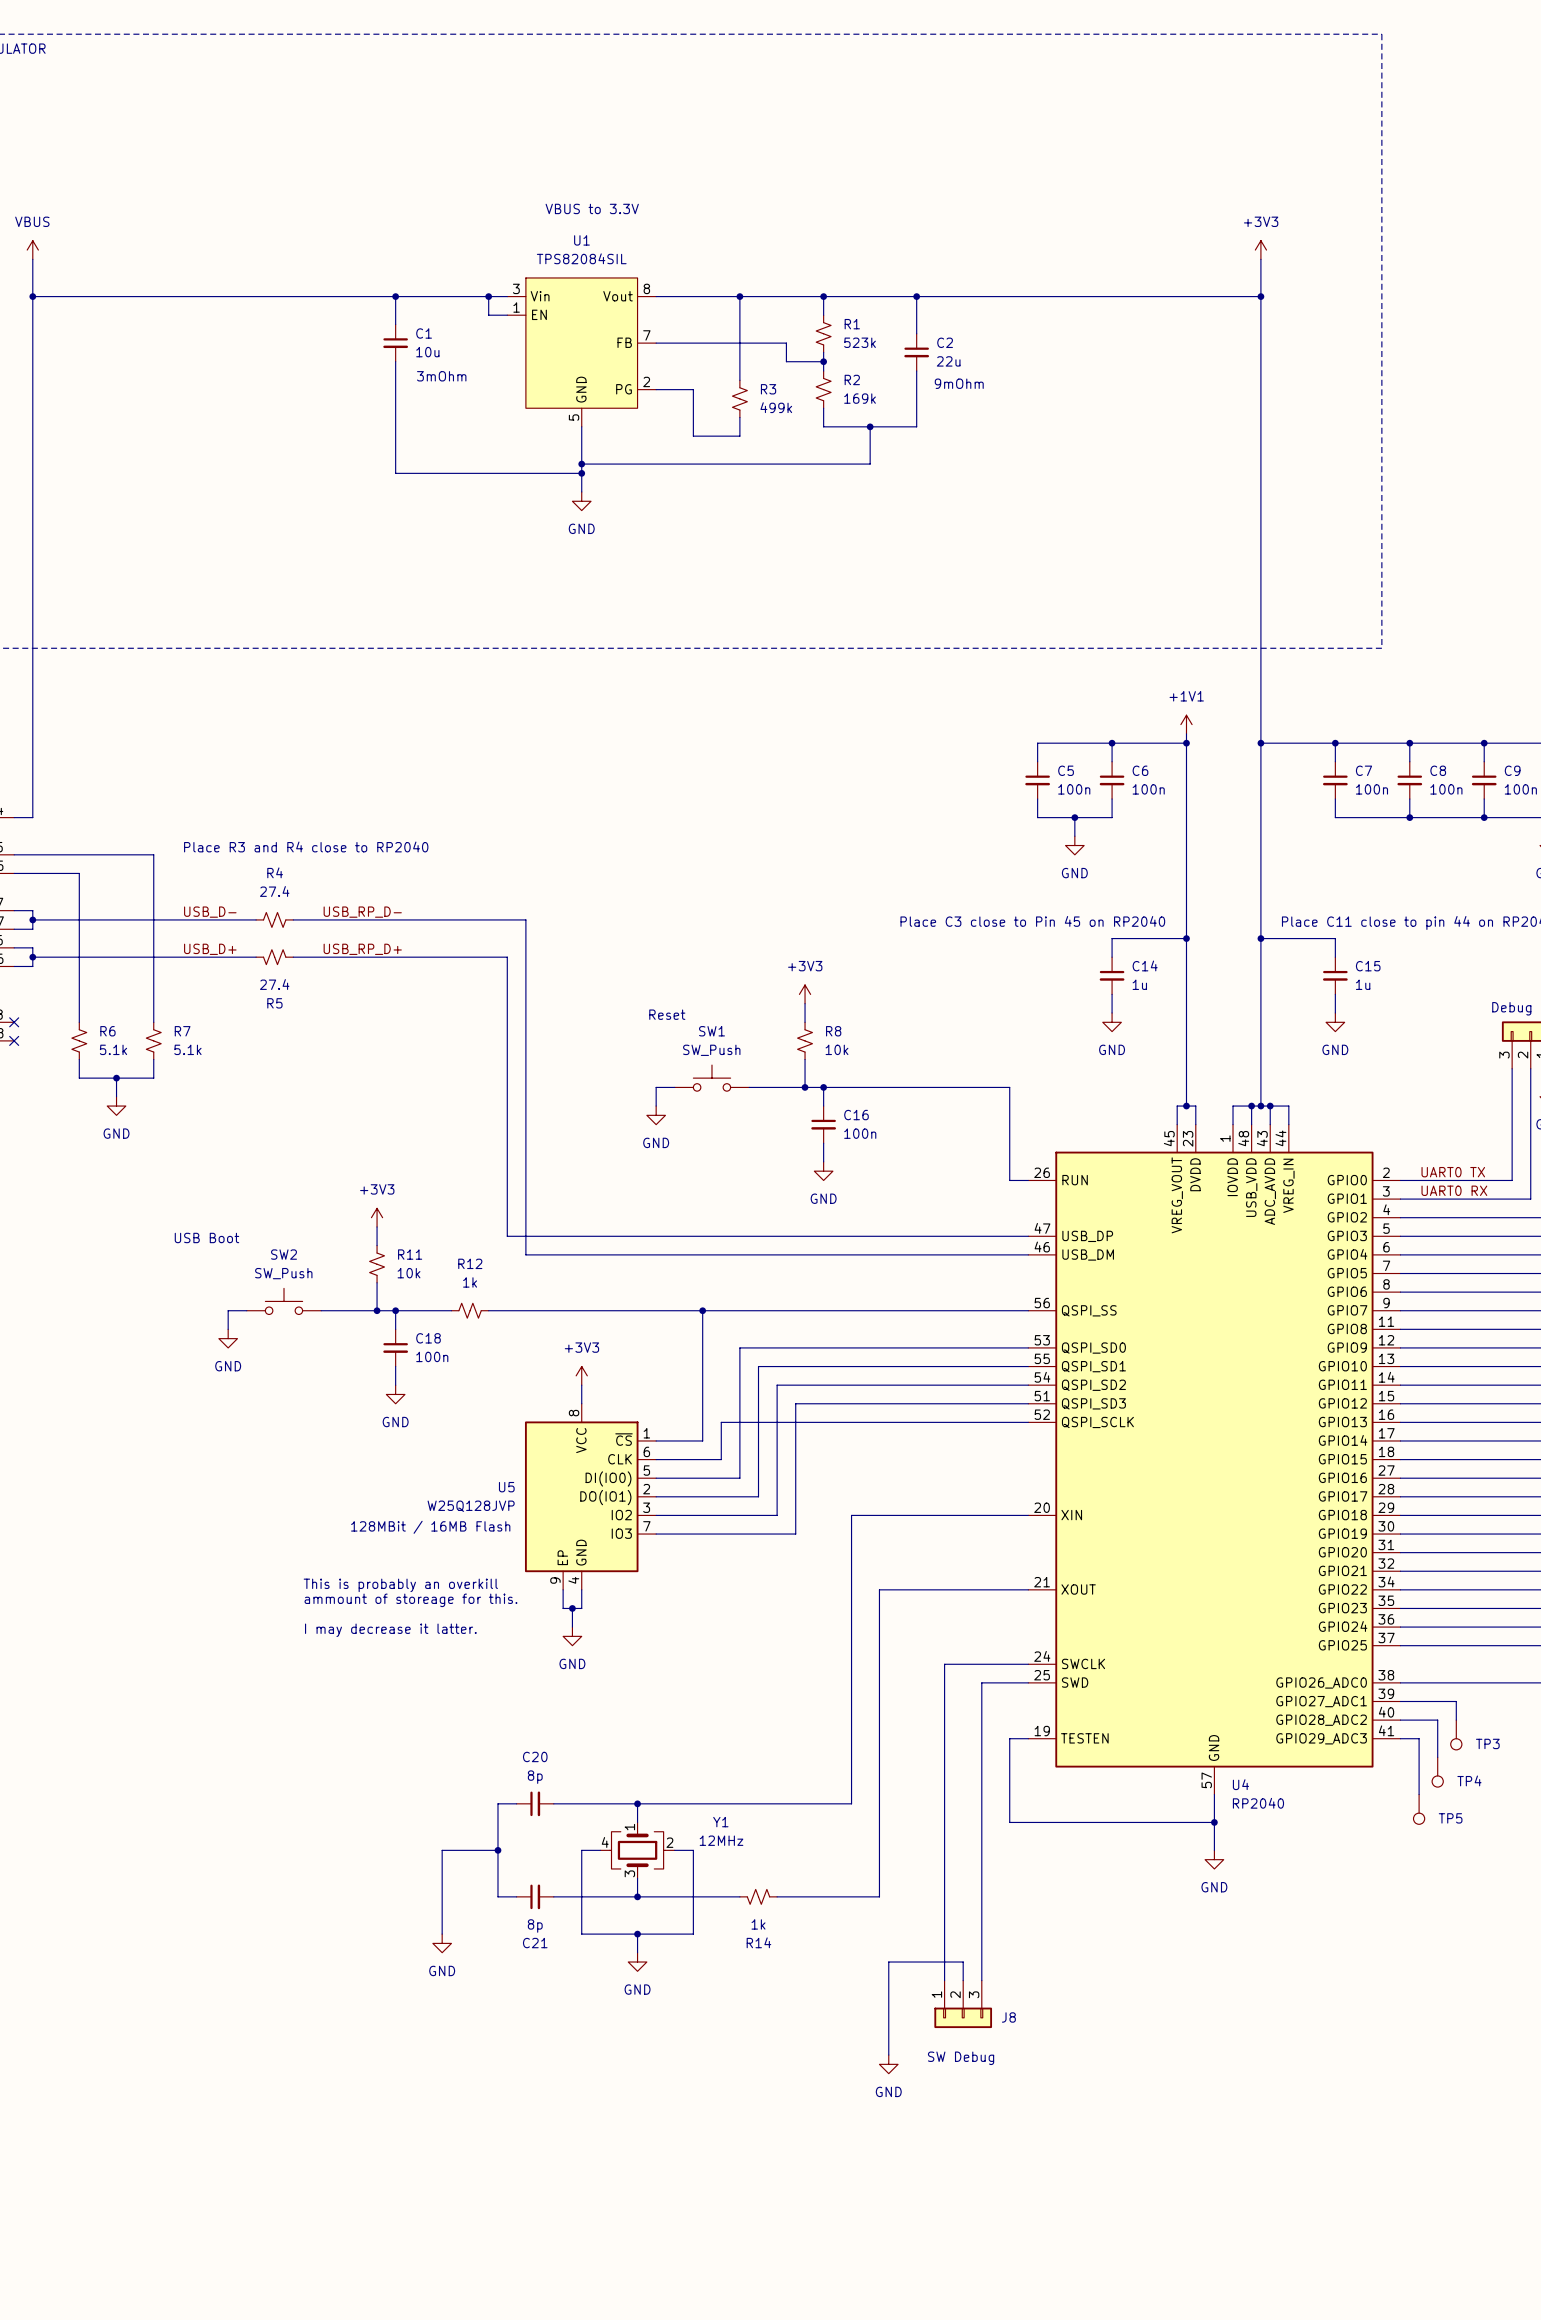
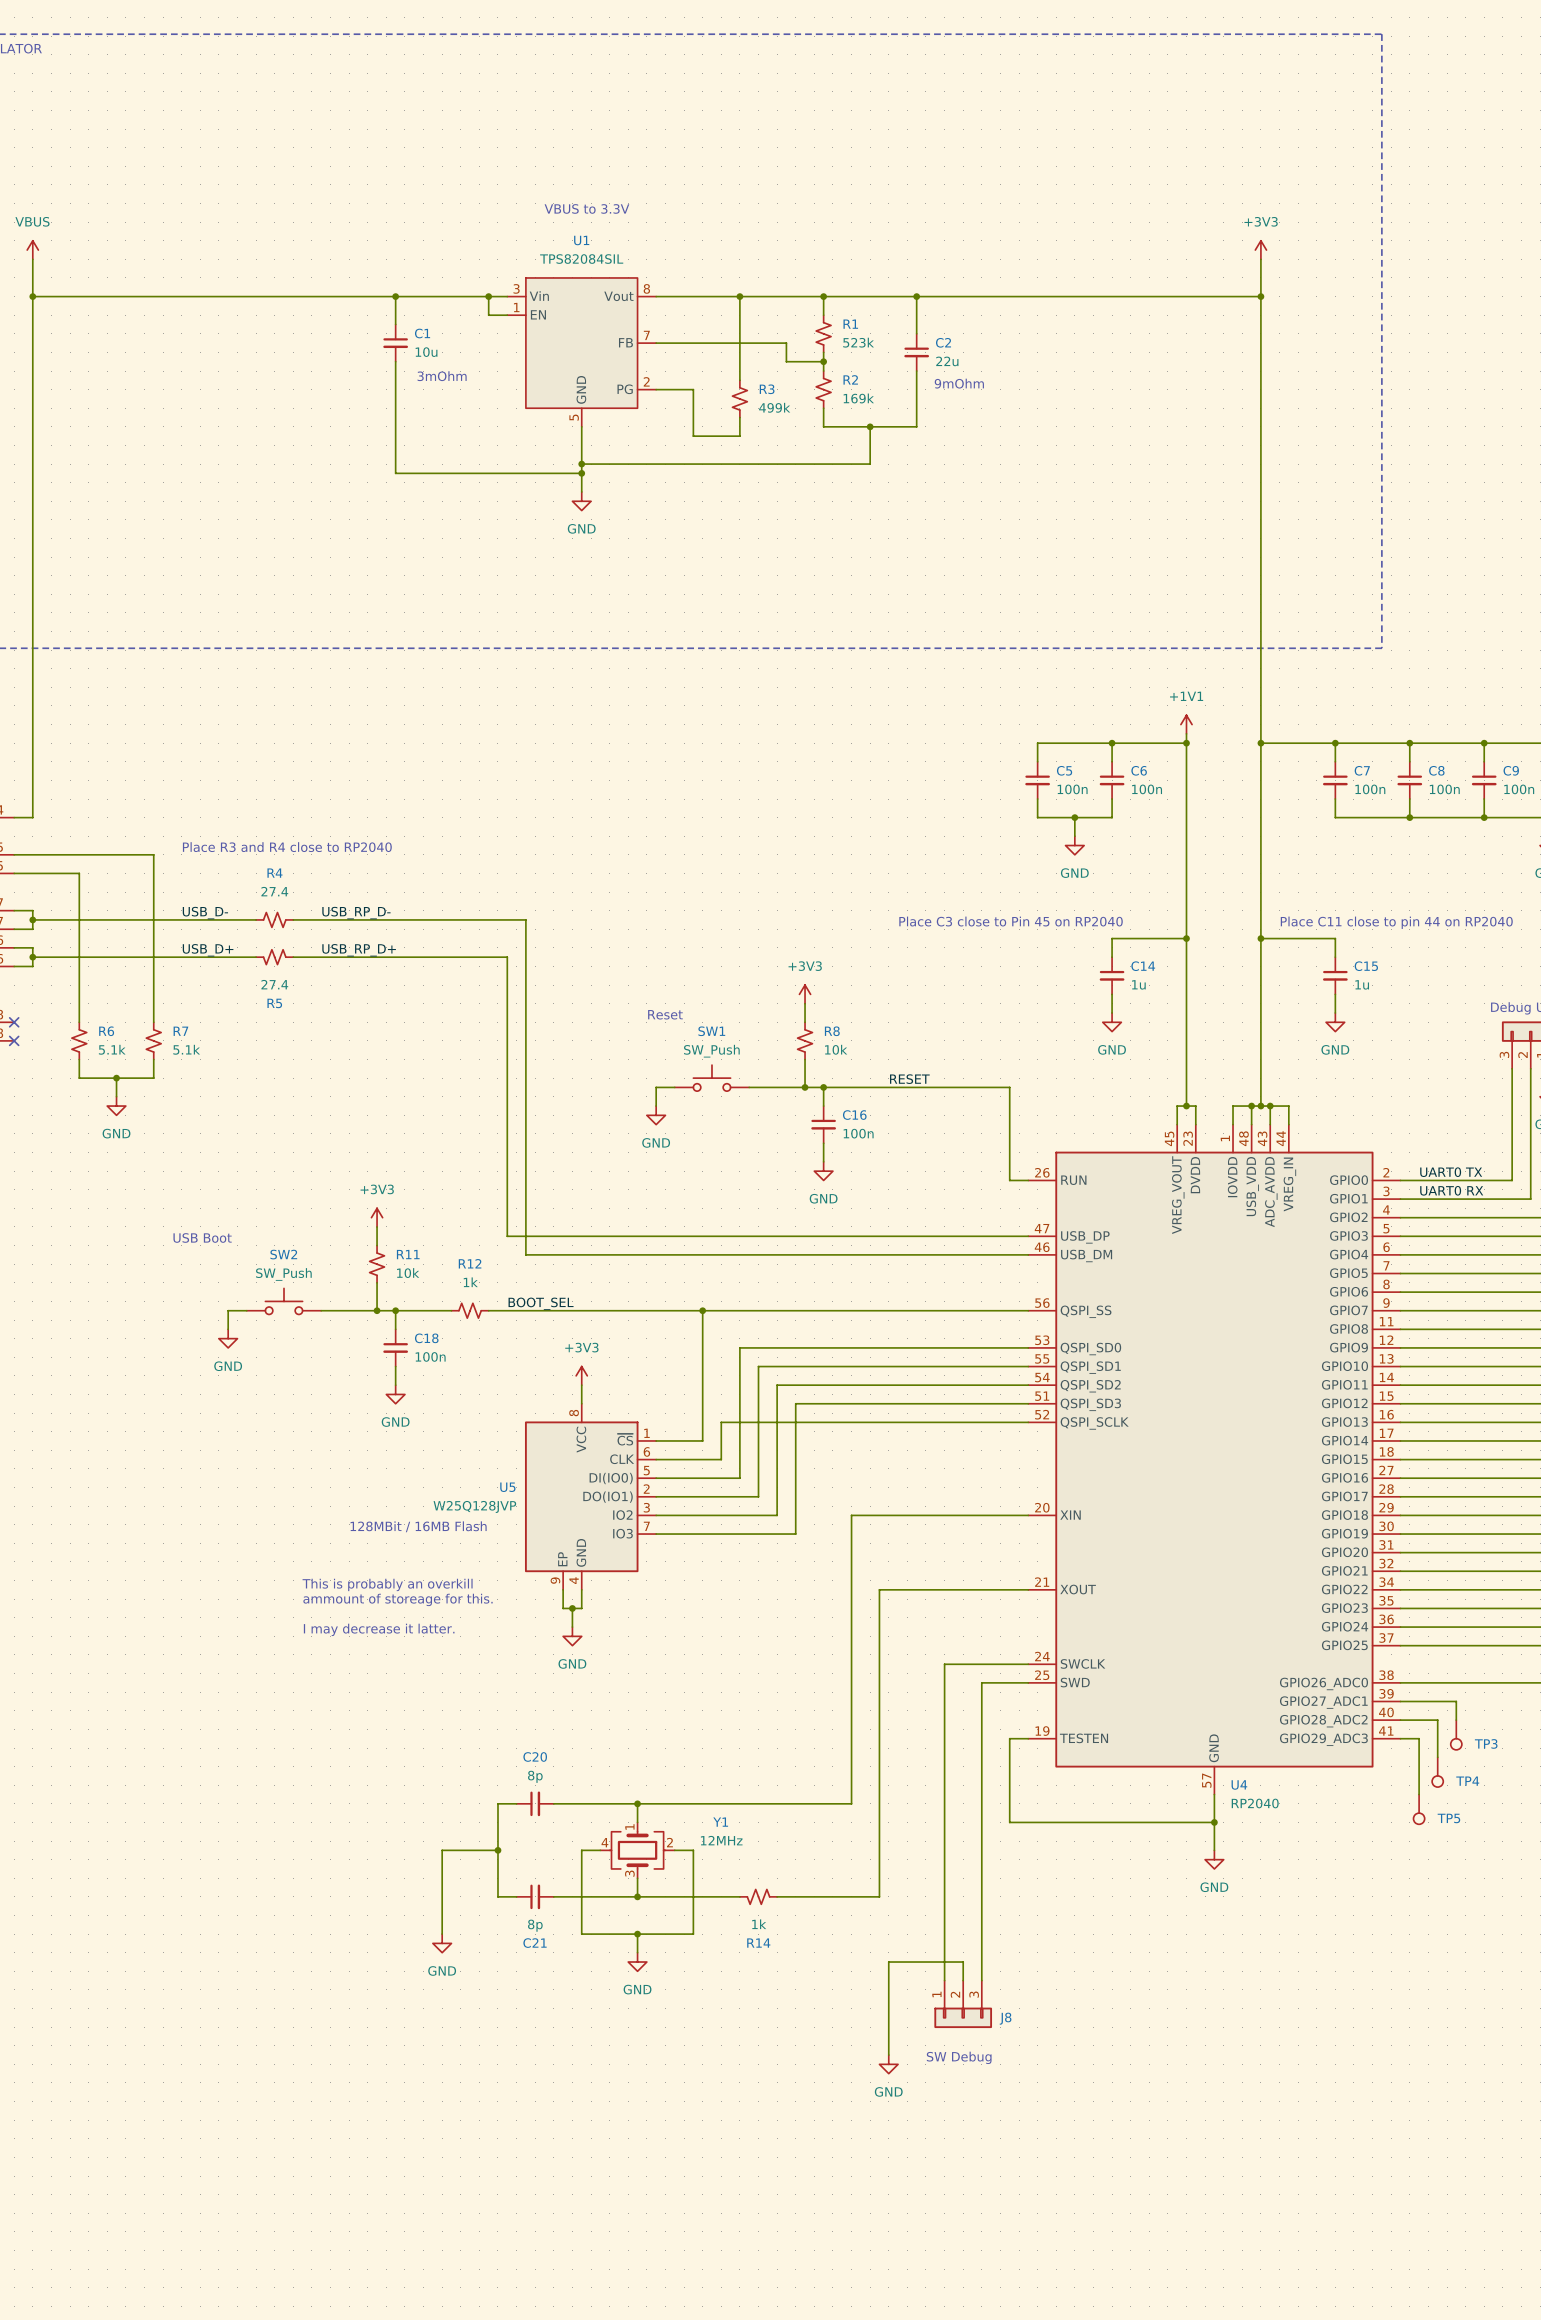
label: none -> RESET (909, 1079)
label: none -> BOOT_SEL (541, 1303)

